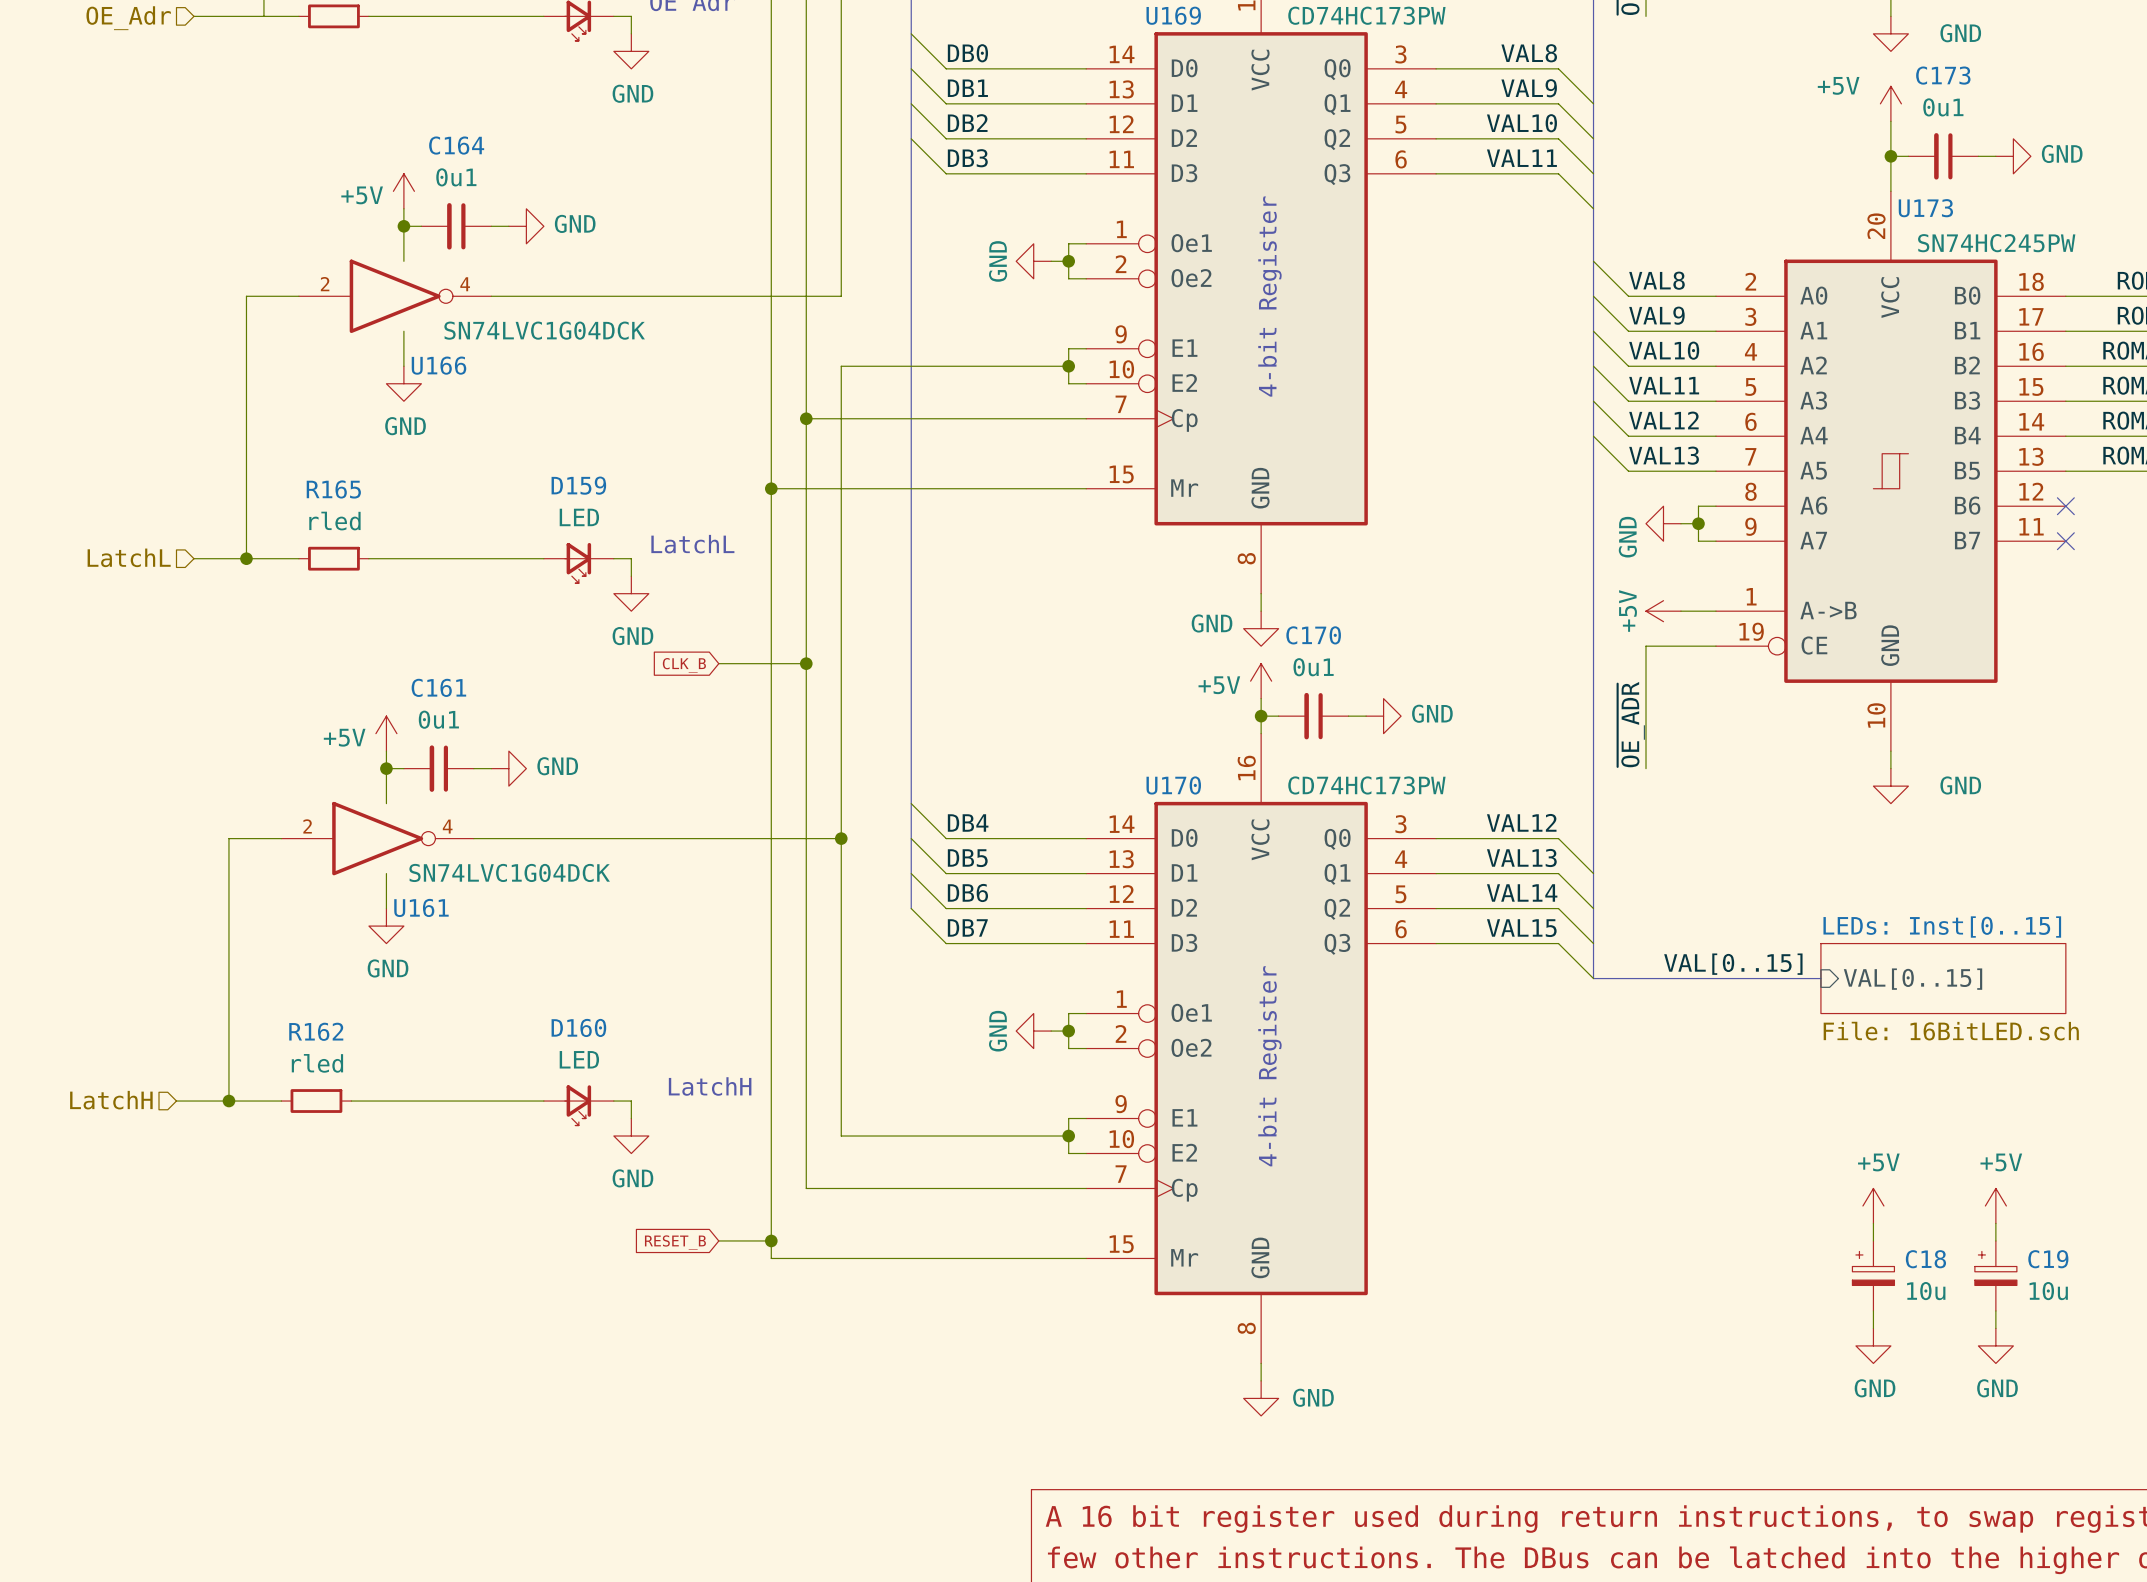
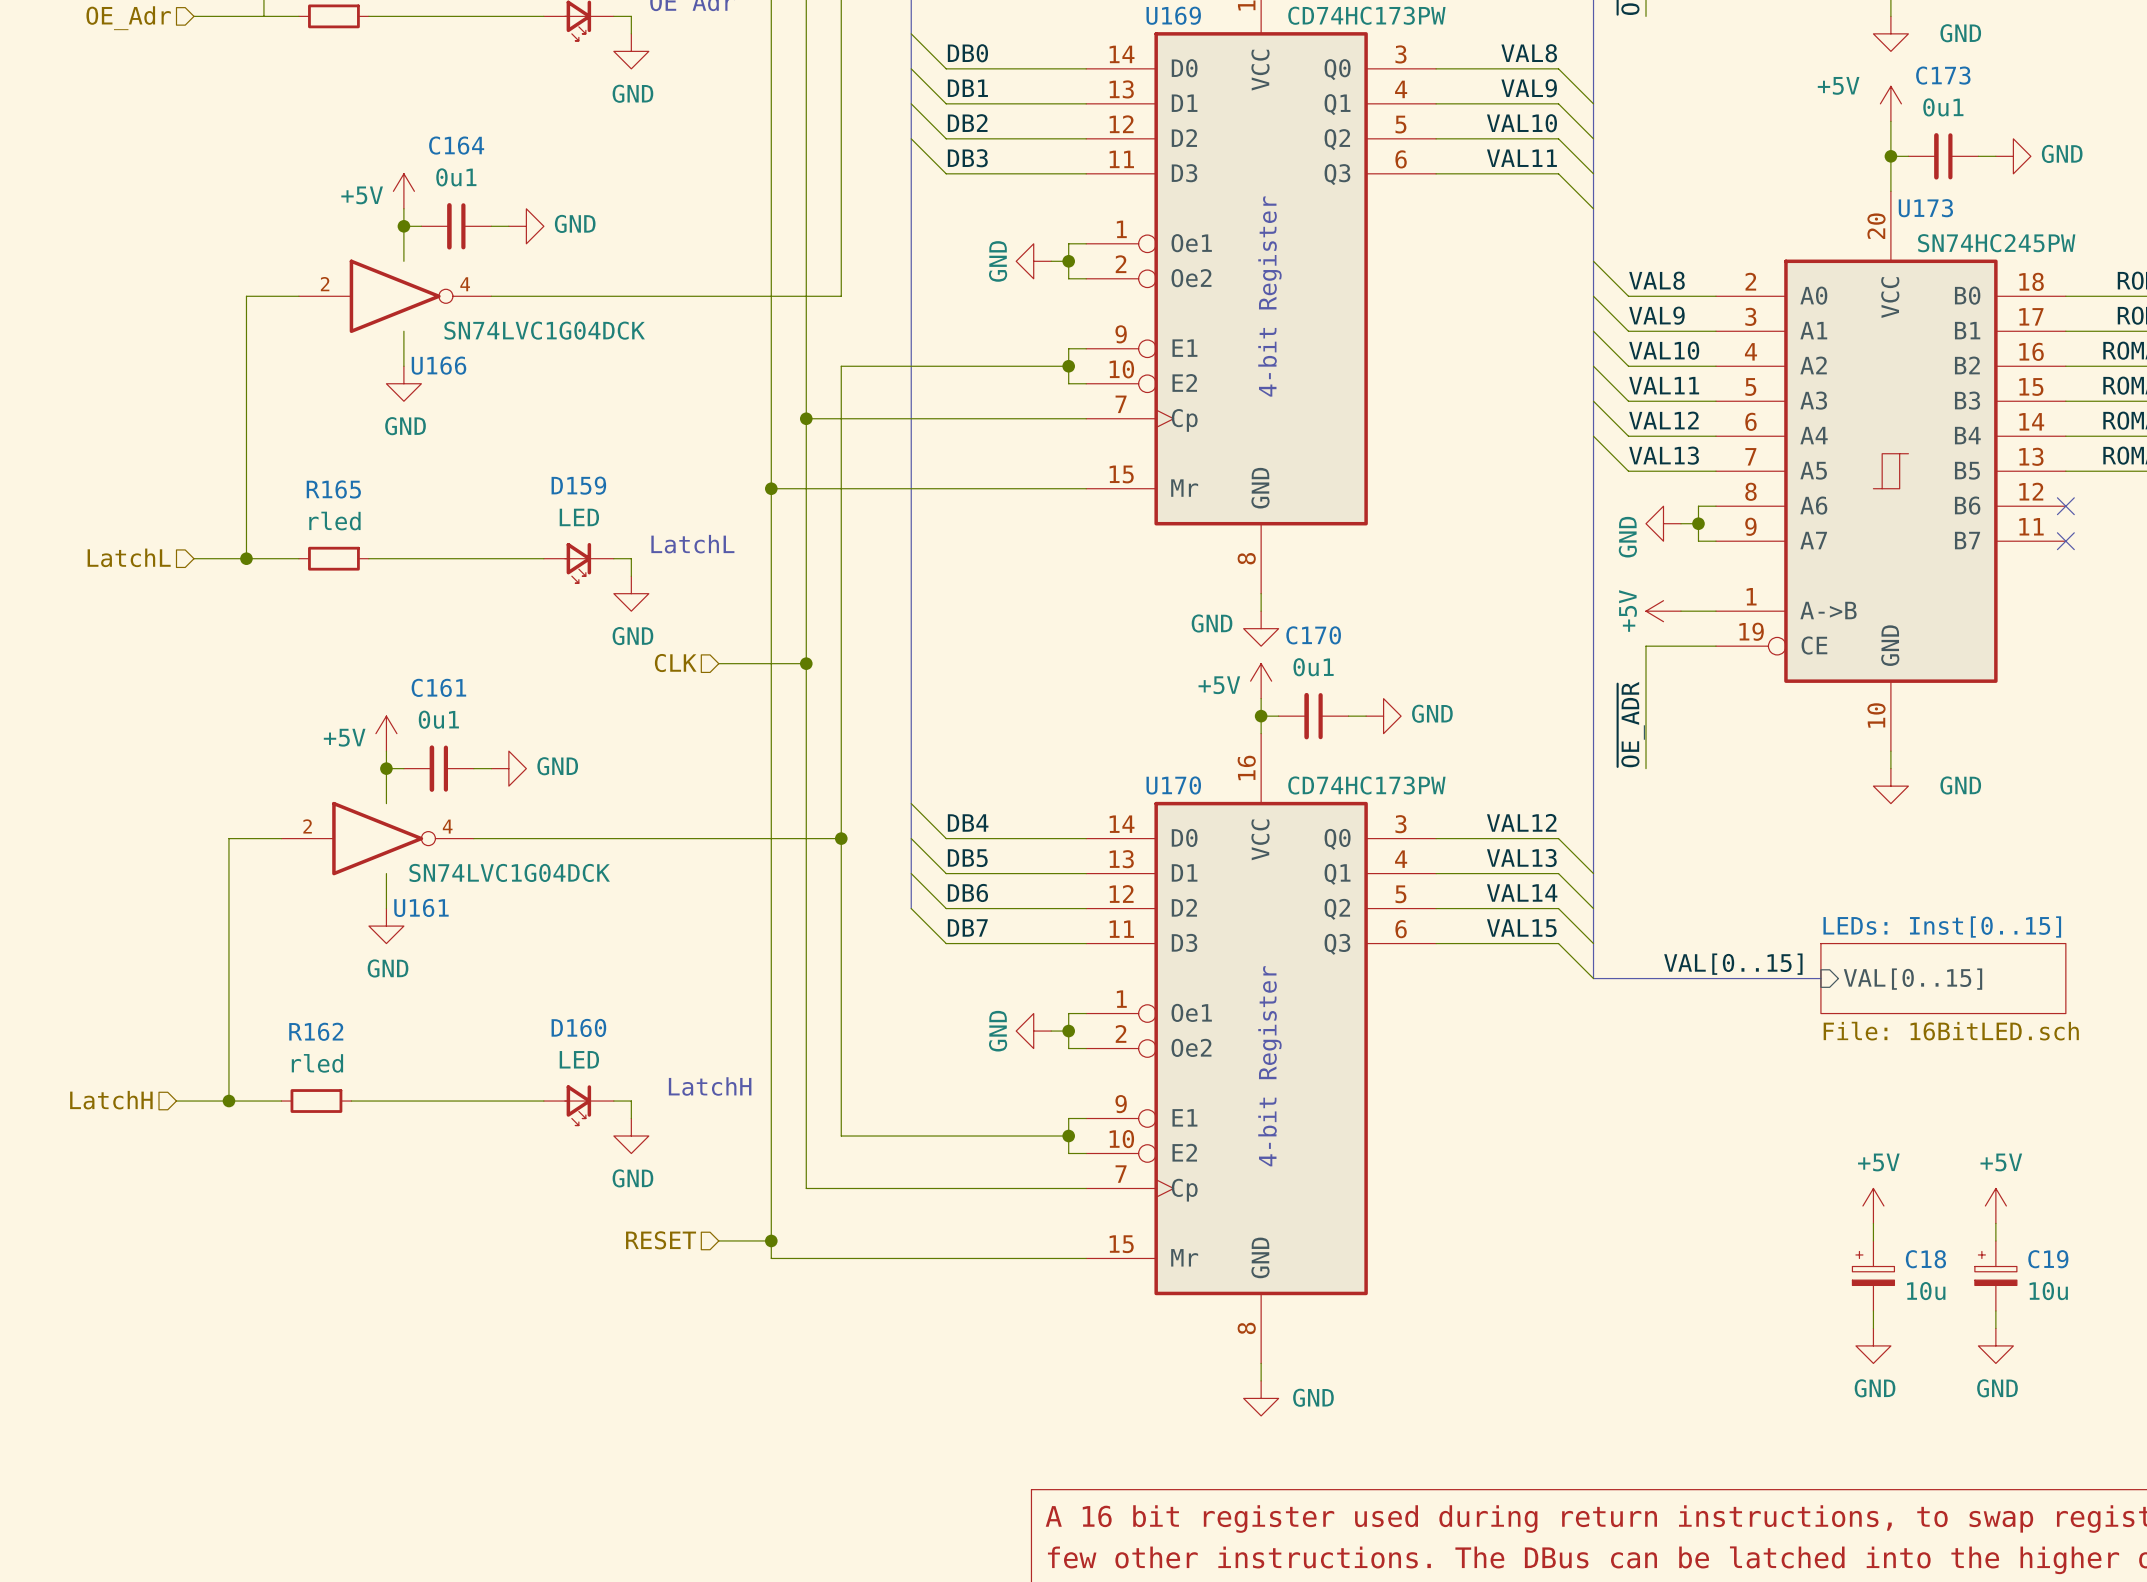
hierarchical label: none -> CLK (675, 663)
global label: CLK_B (684, 665) -> none
hierarchical label: none -> RESET (661, 1240)
global label: RESET_B (675, 1242) -> none

